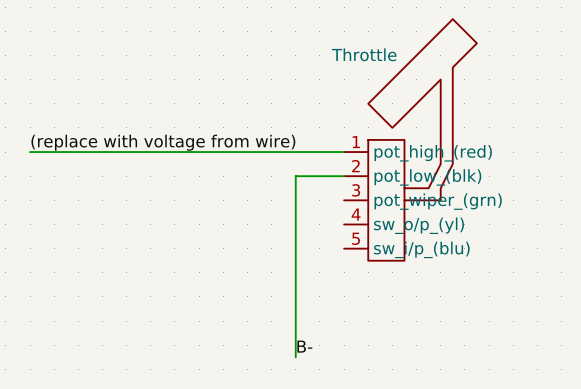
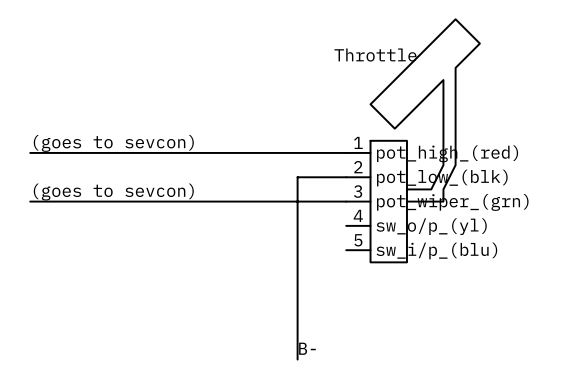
label: (replace with voltage from wire) (163, 142) -> (goes to sevcon) (113, 143)
label: none -> (goes to sevcon) (113, 192)
wire: none -> (30, 201) (346, 201)

